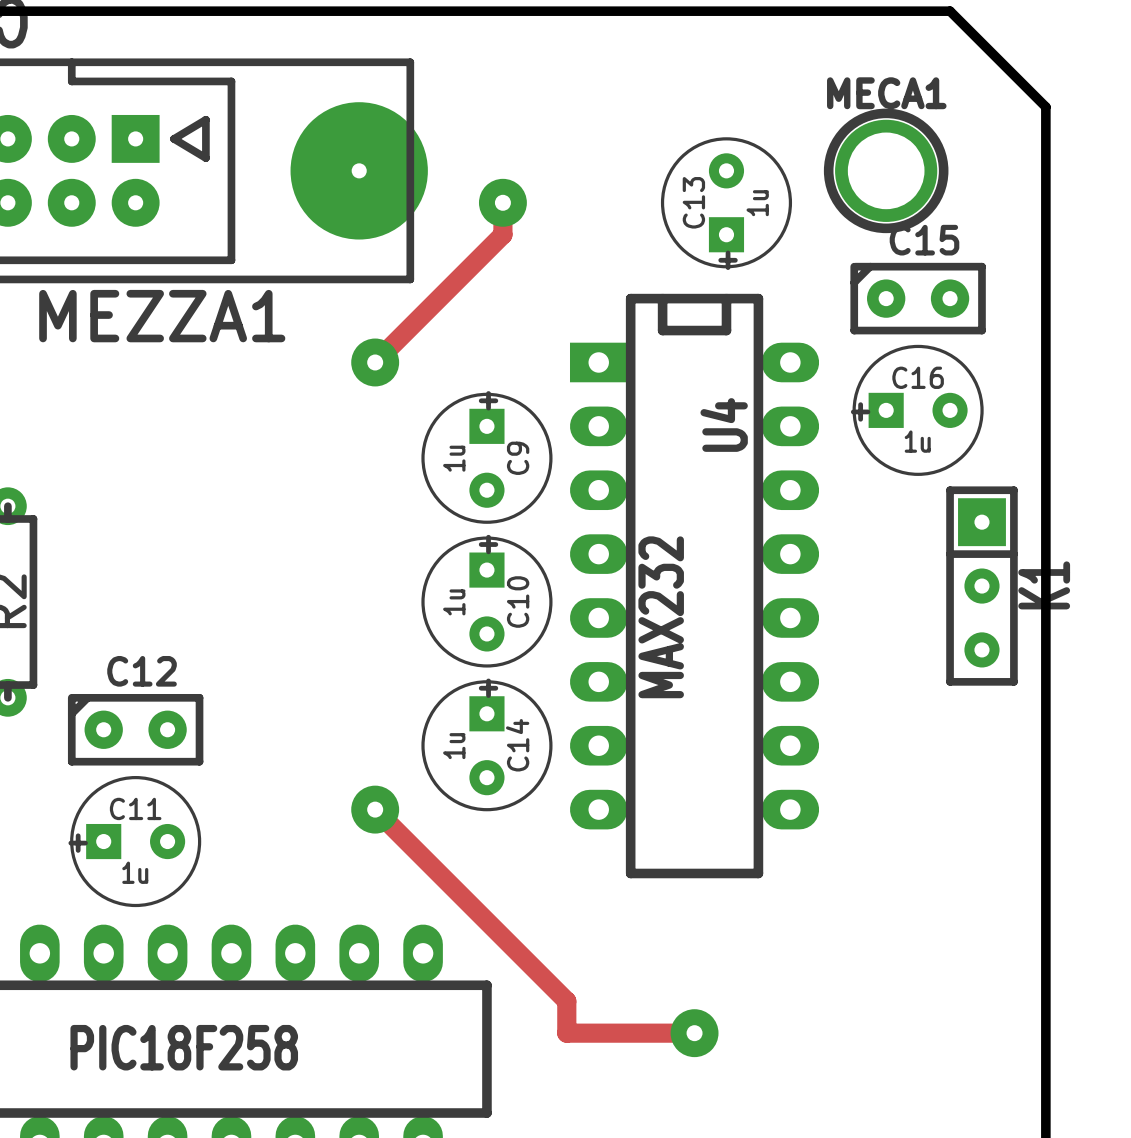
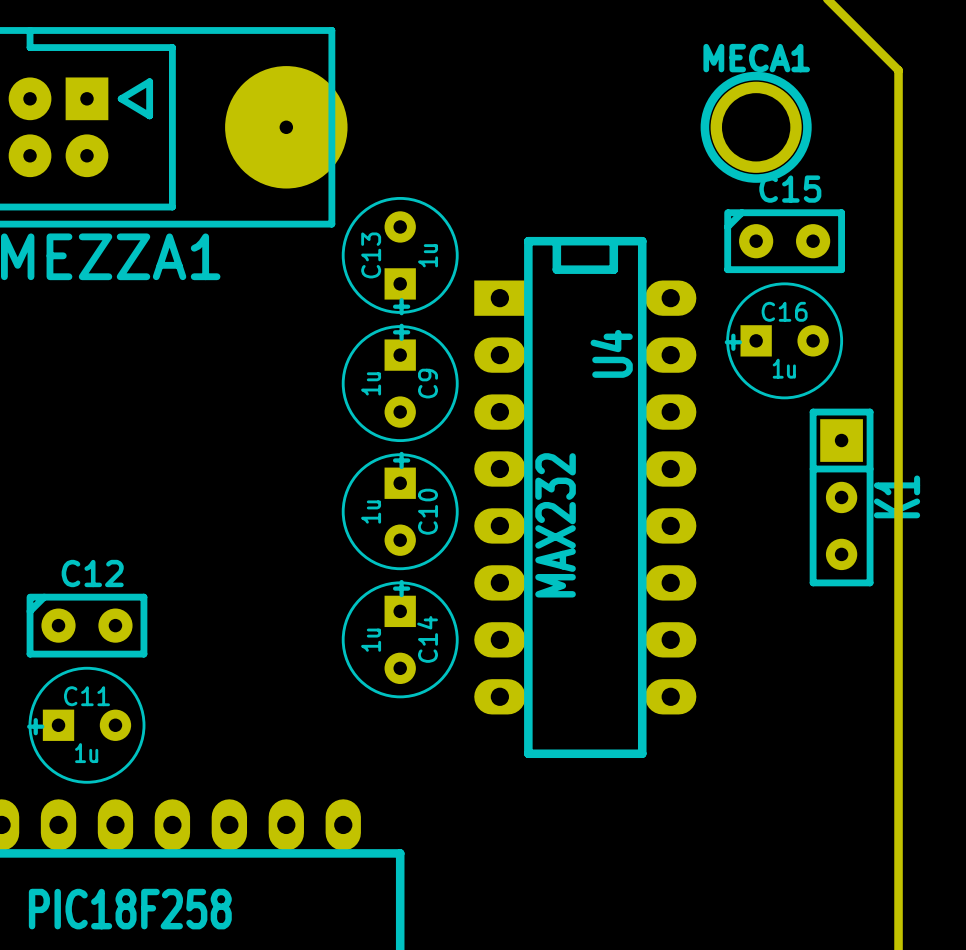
track: (502, 202) (502, 234) (375, 362) -> none
via: (502, 202) -> none
C13 position: (726, 202) -> (400, 255)
via: (375, 362) -> none
track: (375, 809) (566, 1001) (566, 1033) (694, 1033) -> none
via: (375, 809) -> none
via: (694, 1033) -> none

